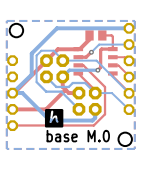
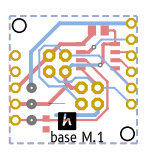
bottom track: (31, 53) (31, 74) (12, 93) (22, 92) (49, 120) (53, 120) -> (34, 48) (30, 52) (30, 87)
via: none -> (31, 87)
via: none -> (31, 104)
drawing: [44, 109, 64, 128] -> none
drawing: none -> [57, 112, 77, 131]
via: none -> (31, 120)
part: none -> (46, 123)
text: base M.0 (78, 136) -> base M.1 (77, 136)

